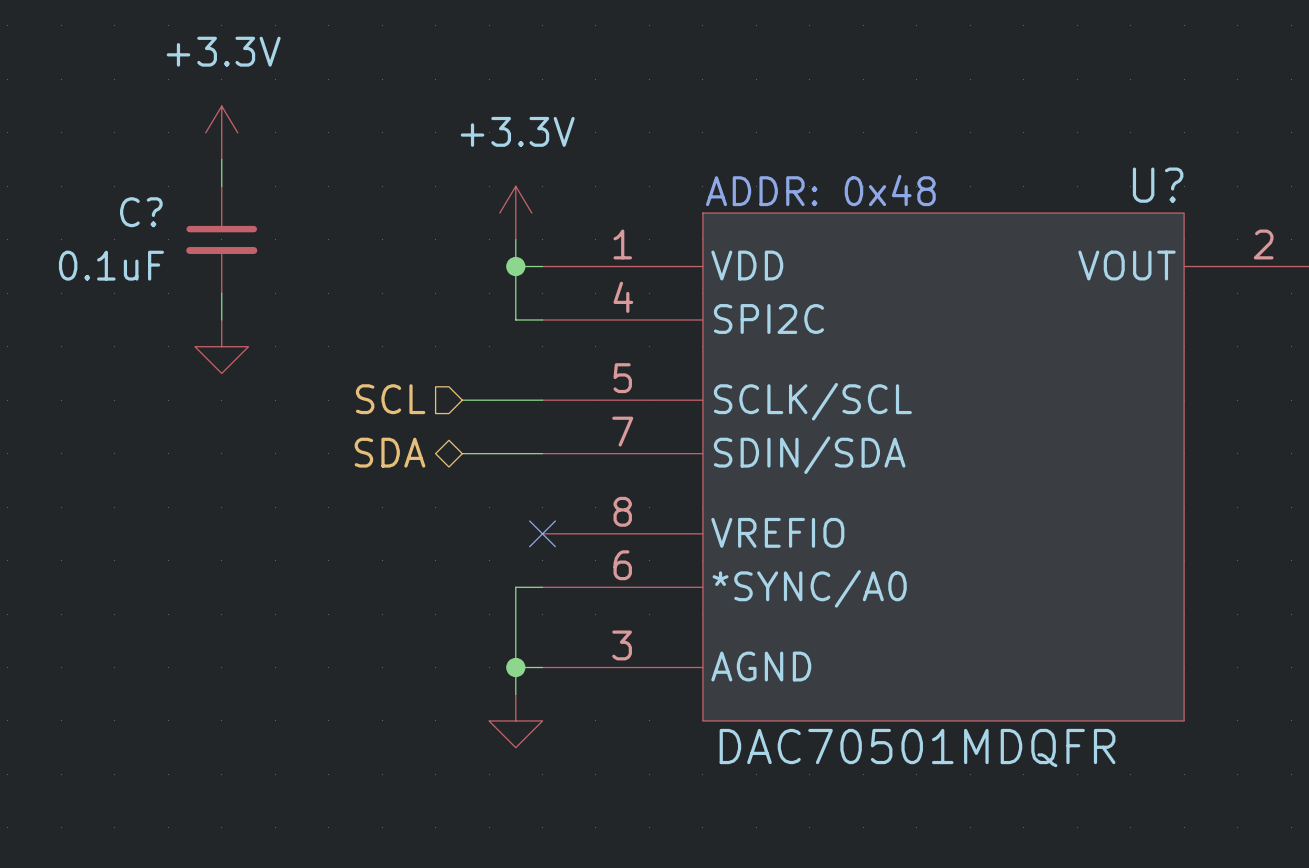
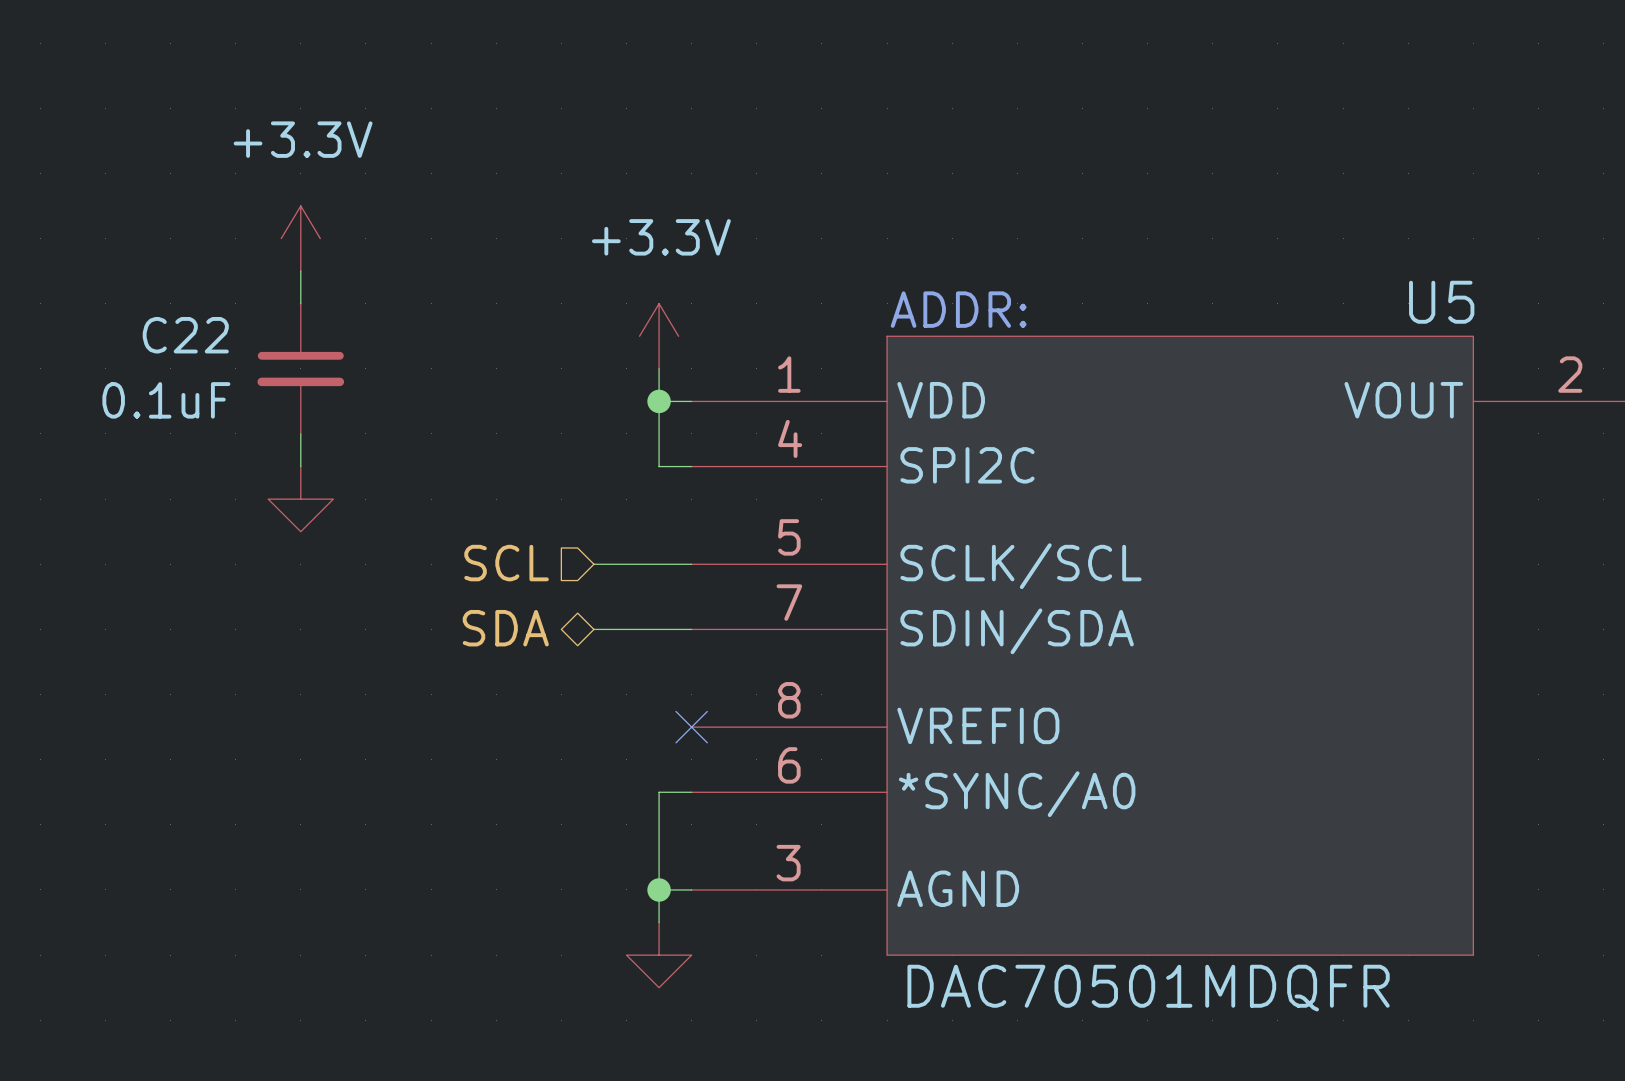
U? name: U? (1158, 185) -> U5 (1441, 302)
text: ADDR: 0x48 (820, 190) -> ADDR: (958, 309)
C? name: C? (141, 212) -> C22 (185, 335)

